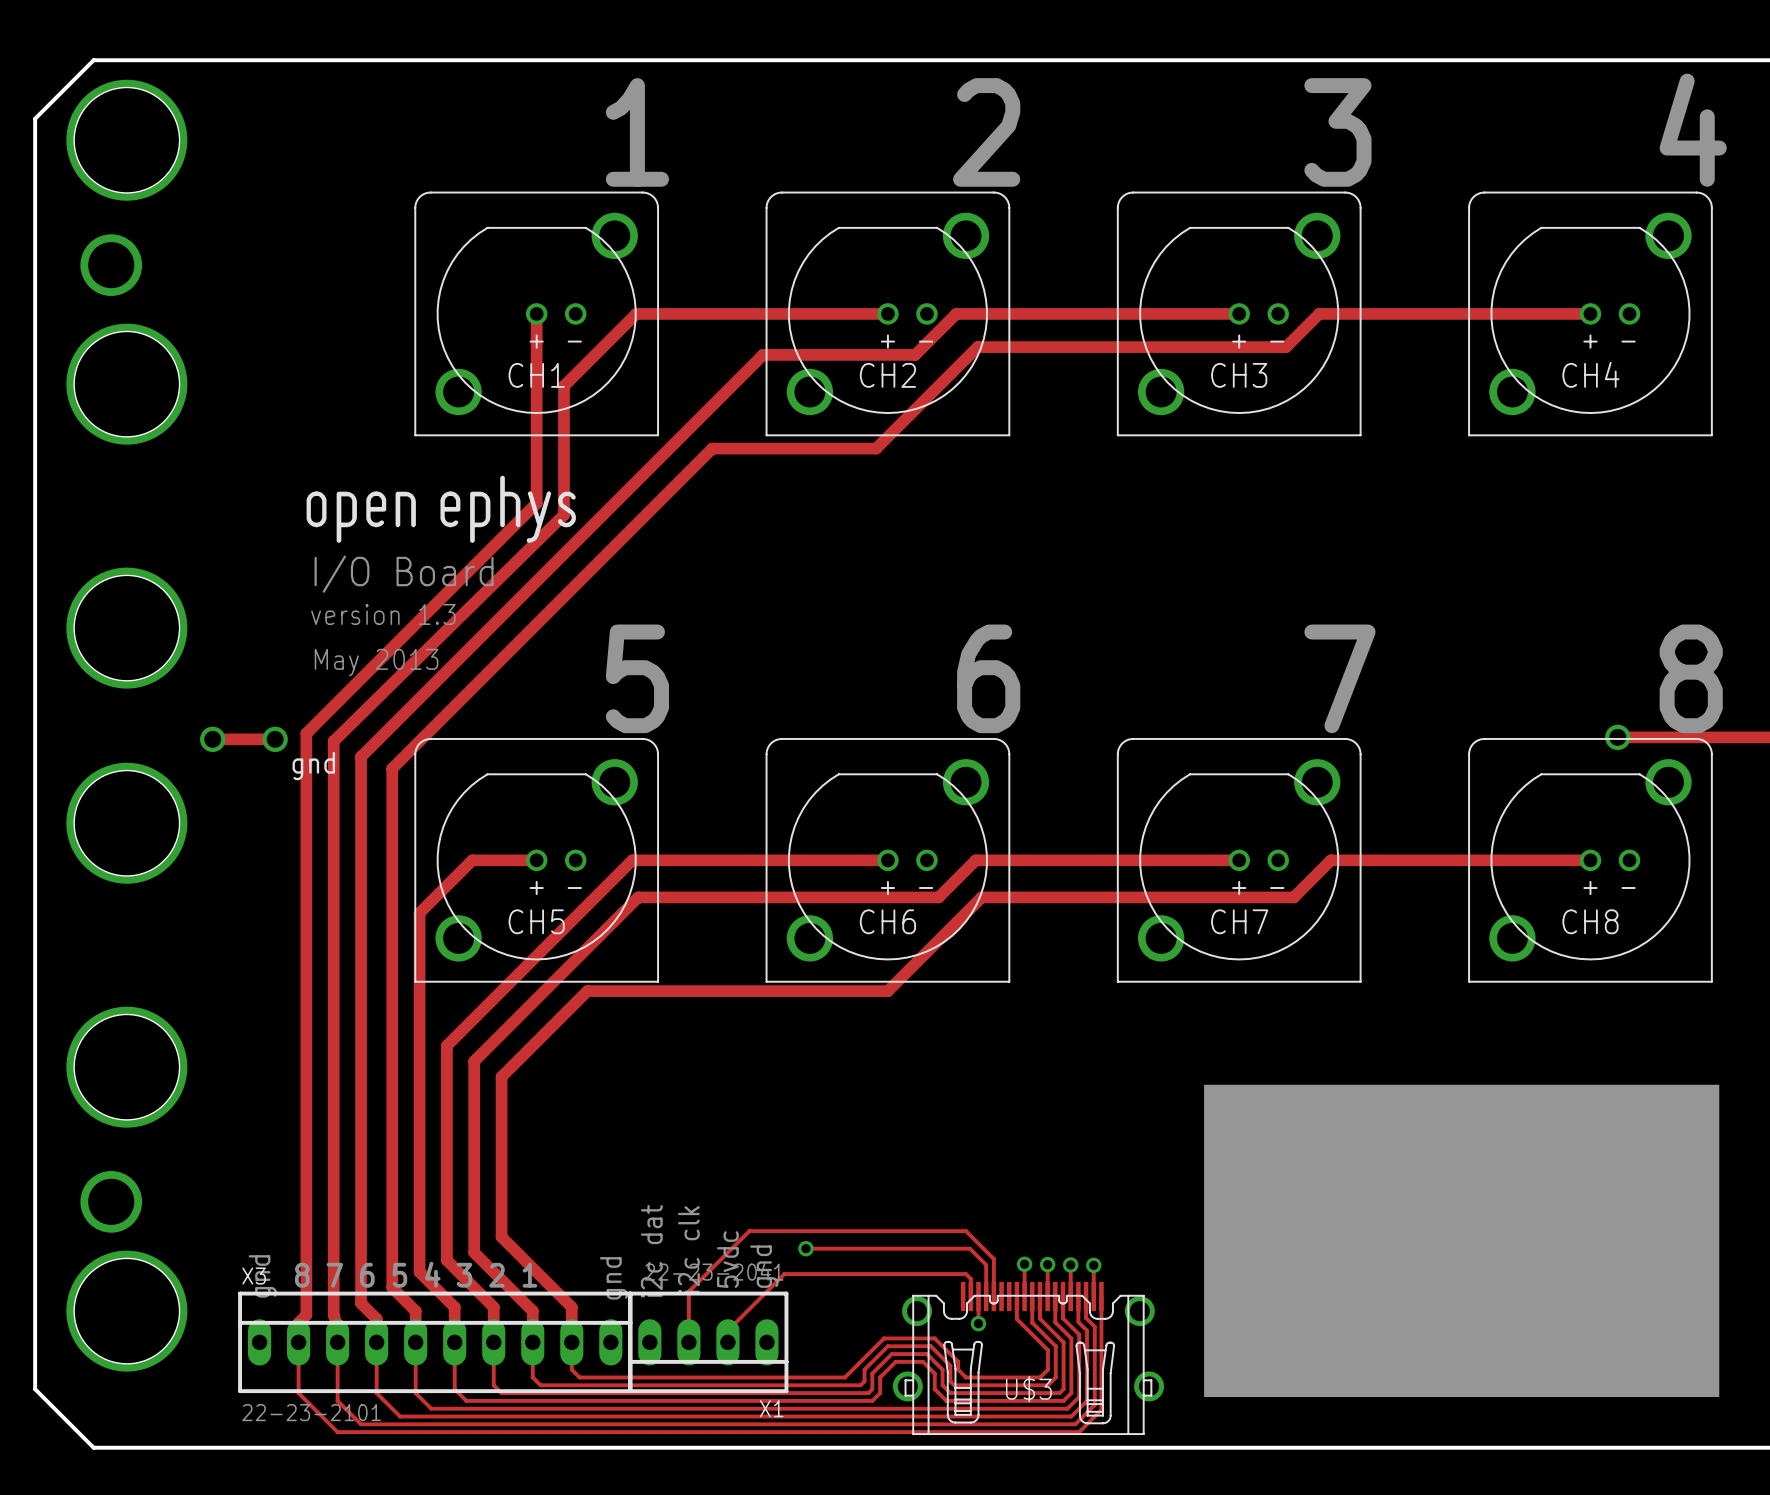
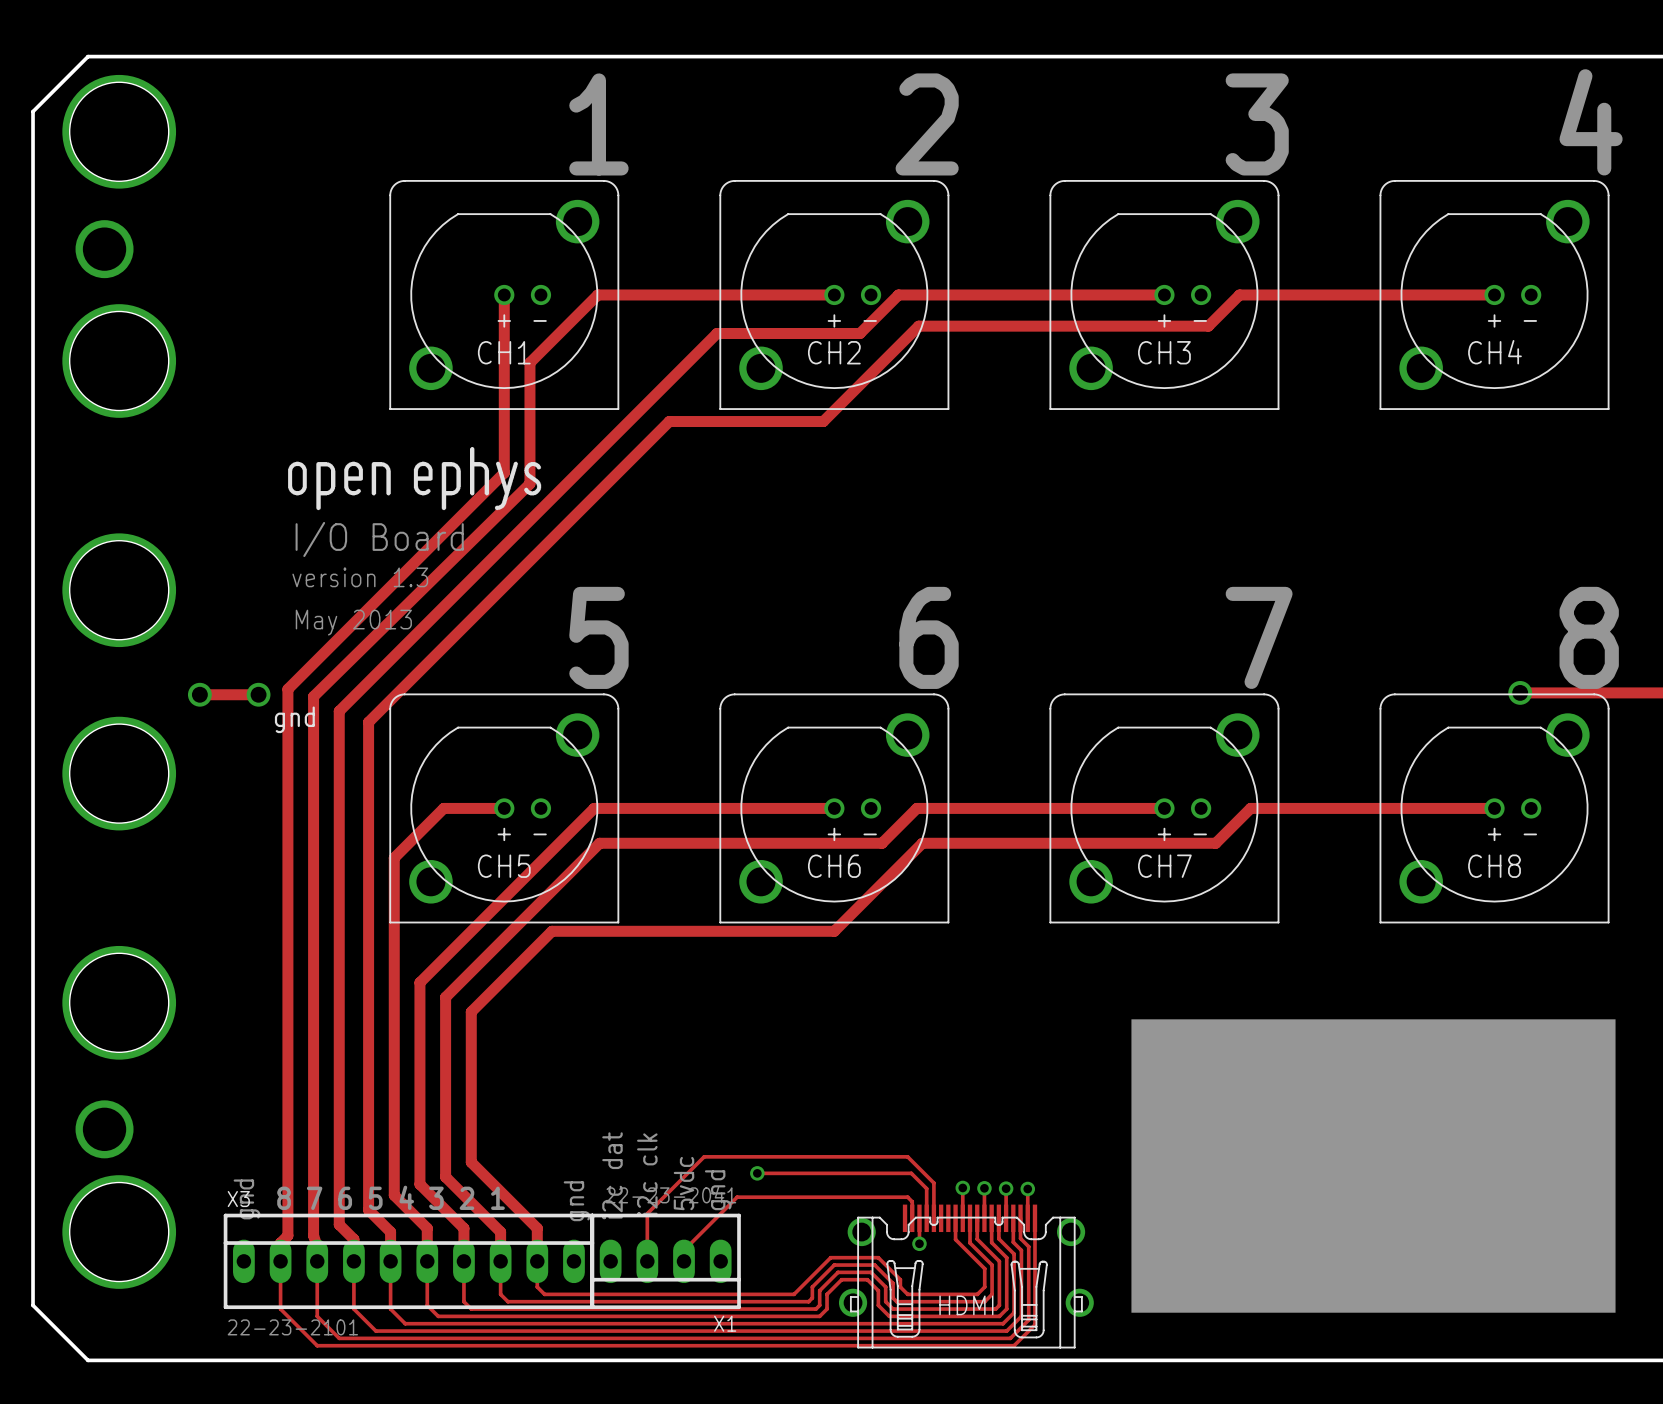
U$3 name: U$3 (1028, 1389) -> HDMI (966, 1305)

